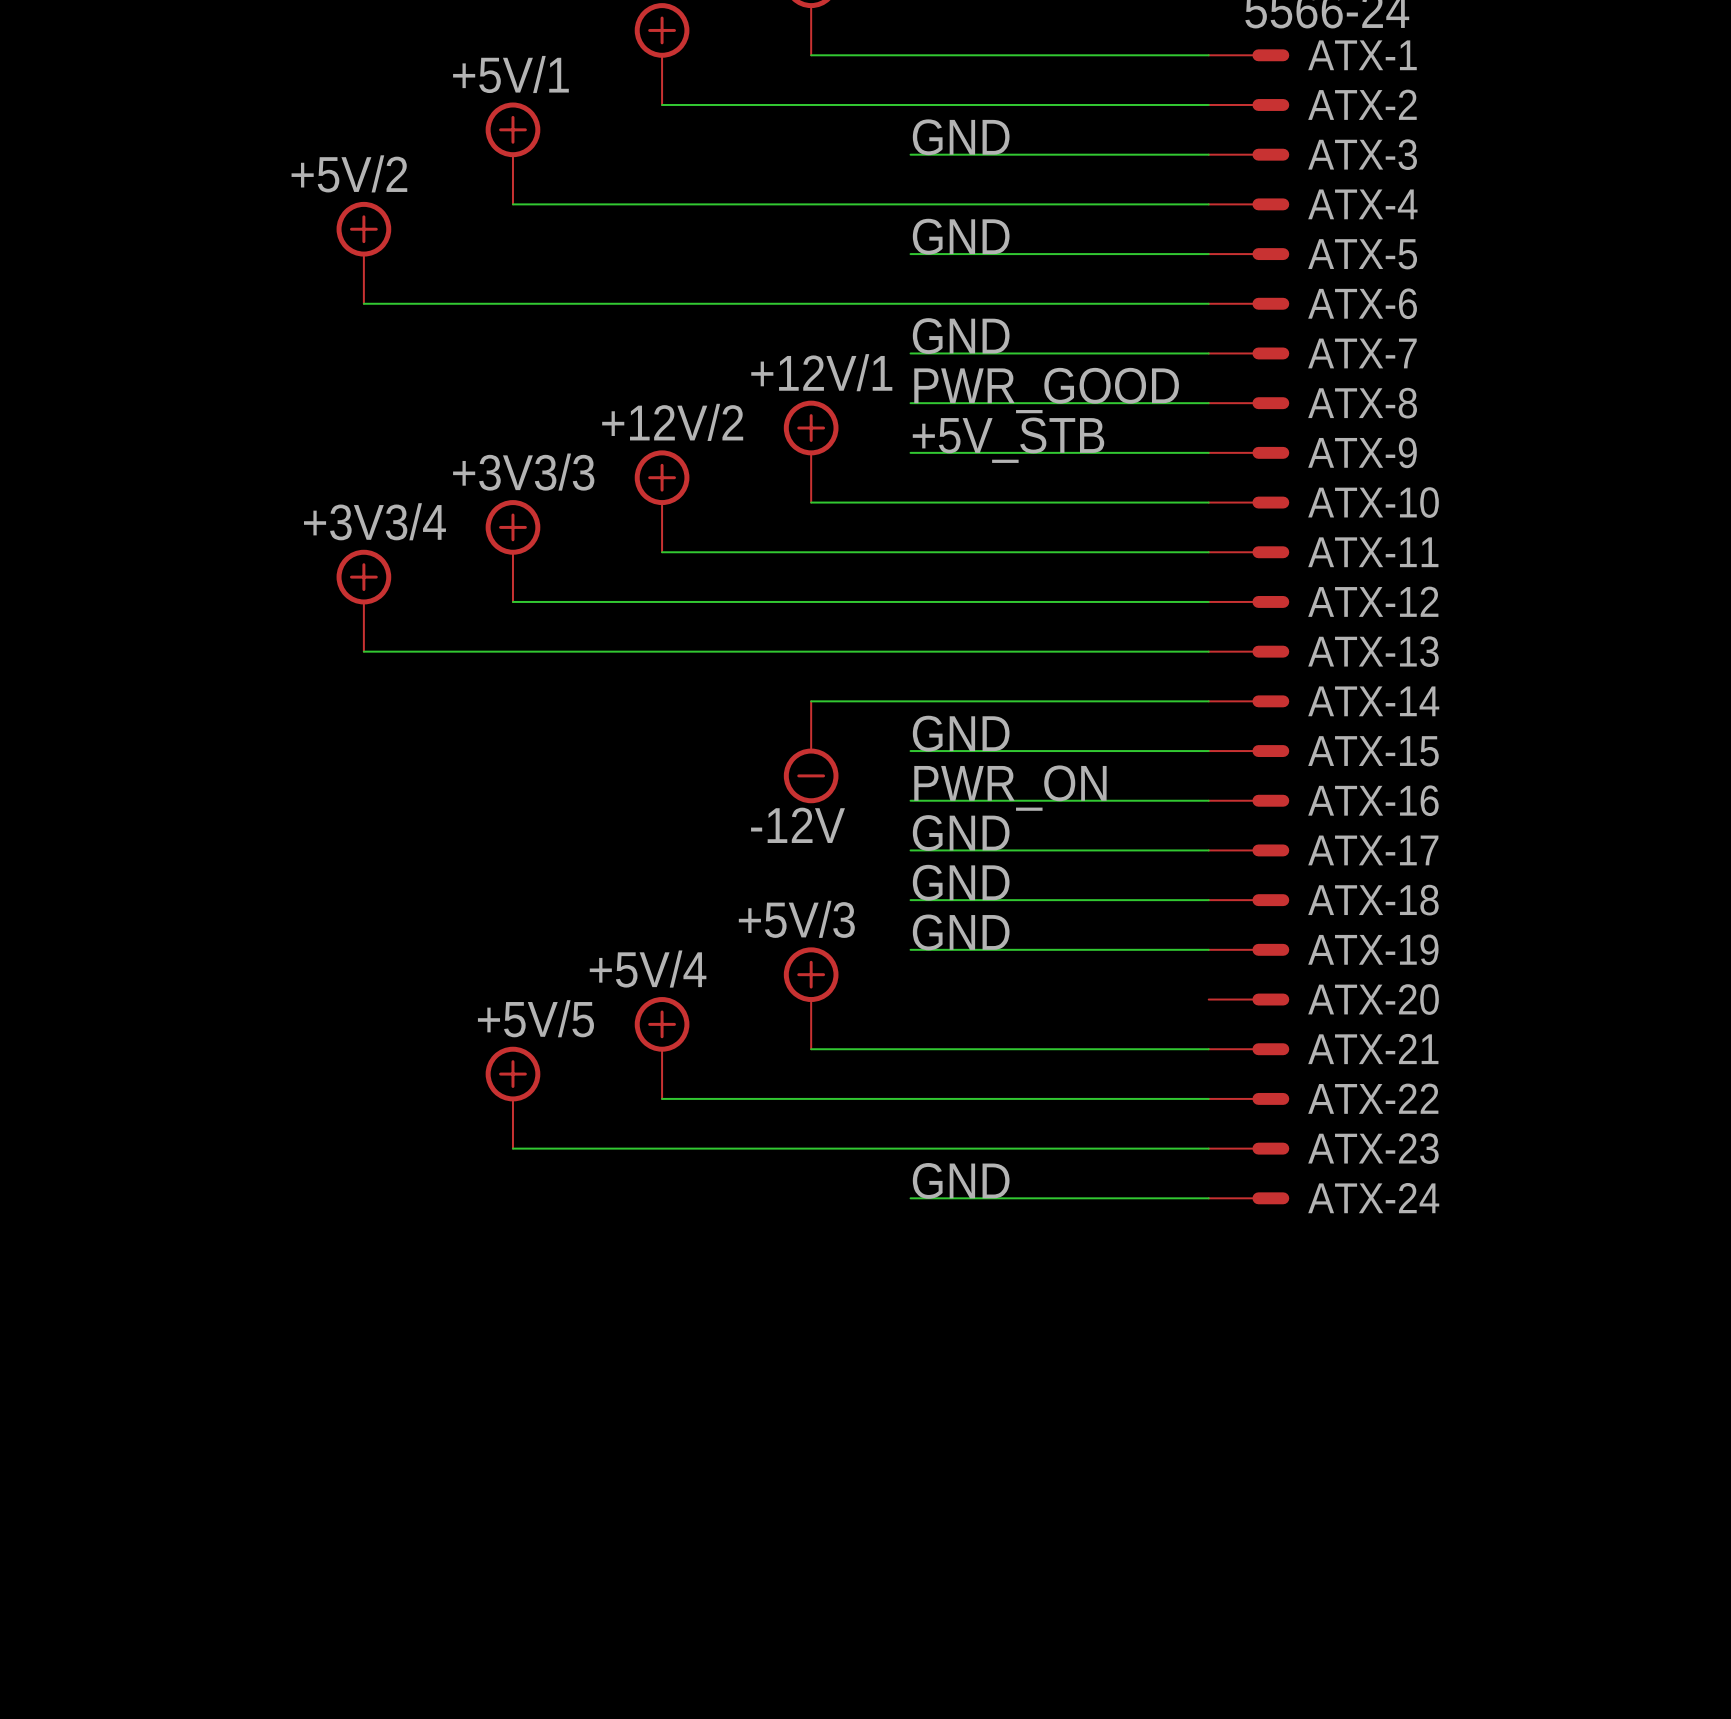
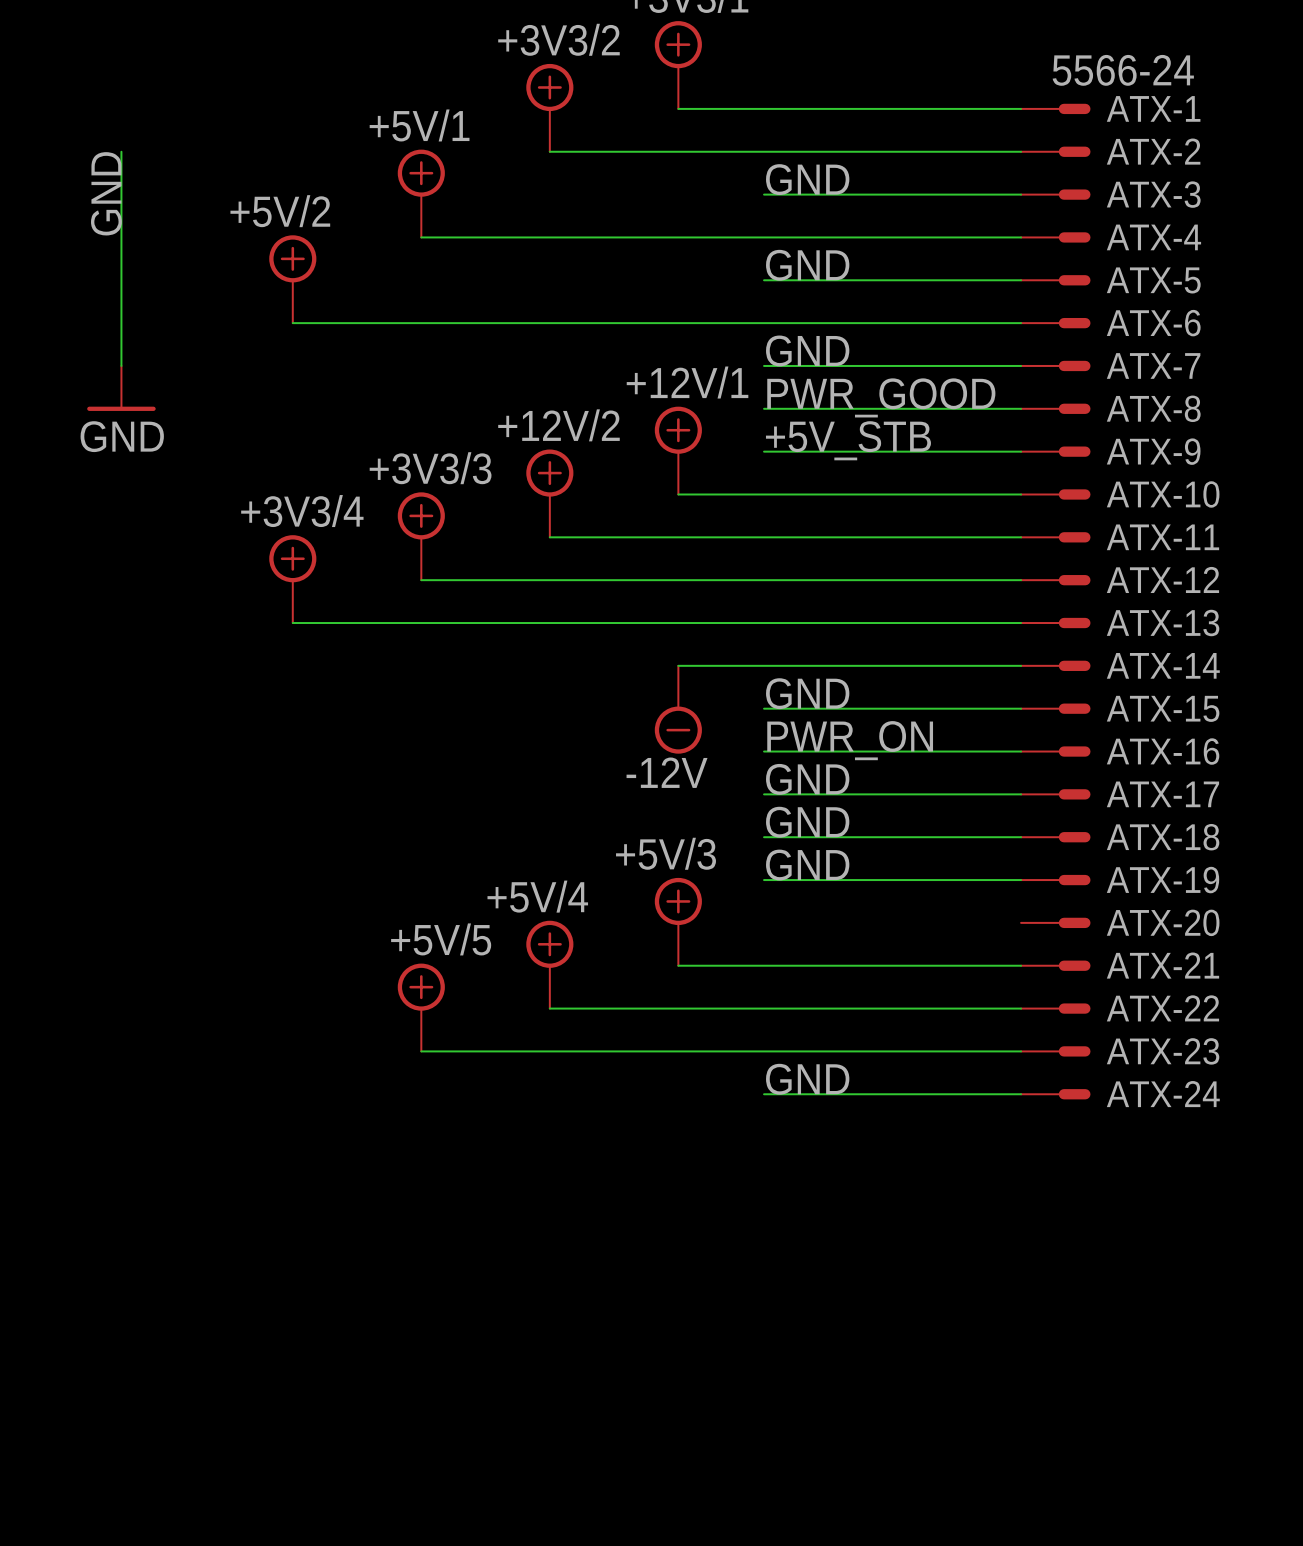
wire: none -> (121, 151) (121, 365)
label: none -> GND (106, 193)
power symbol: none -> GND (121, 388)

